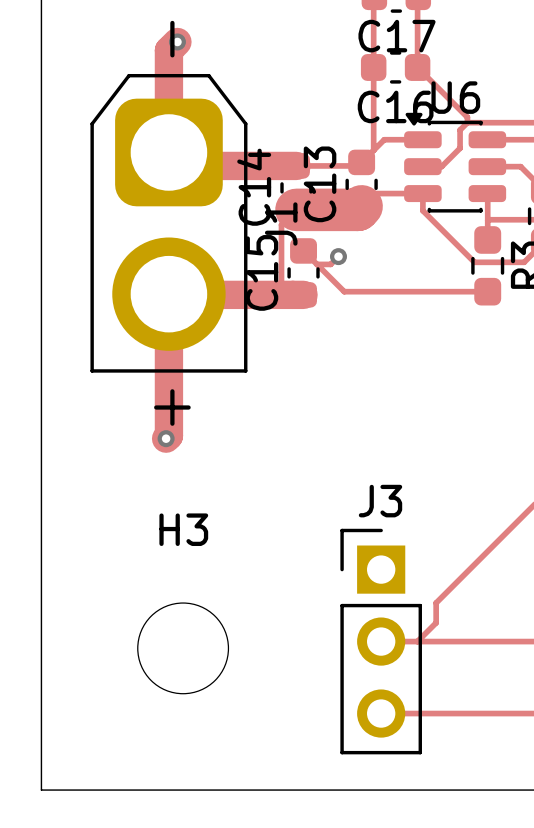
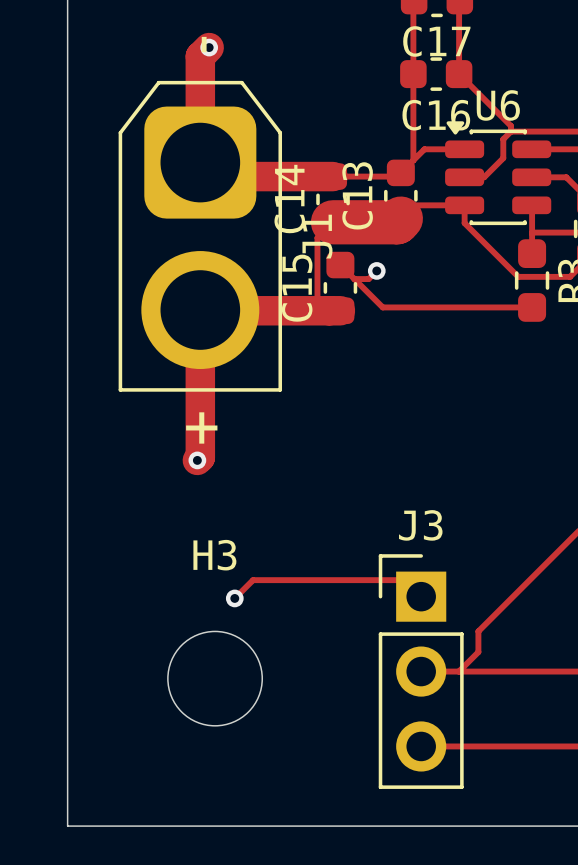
track: none -> (421, 596) (404, 580) (253, 580) (234, 598)
via: none -> (234, 598)

